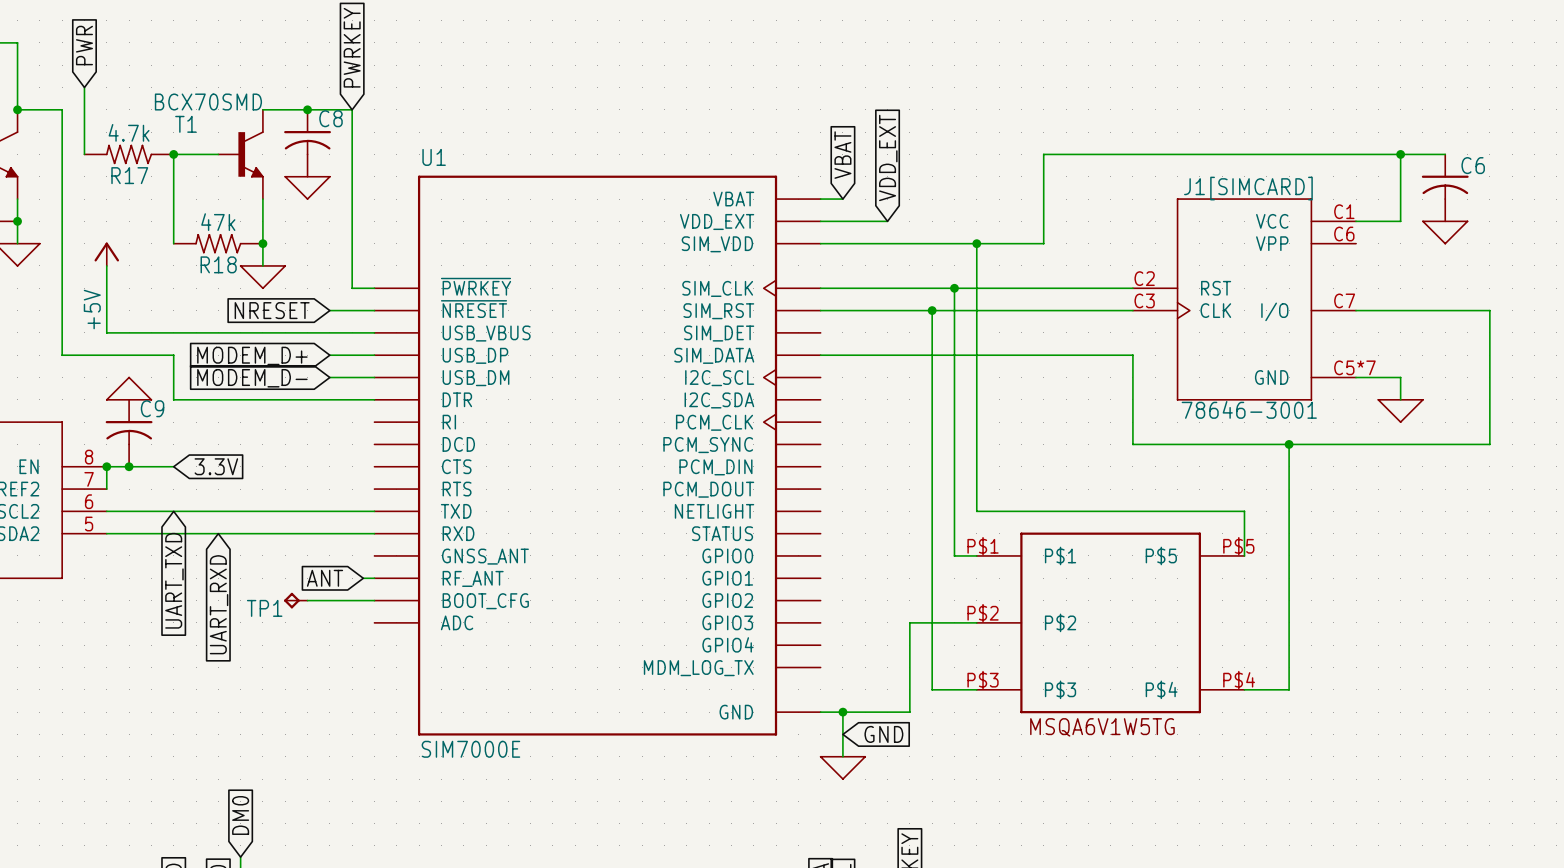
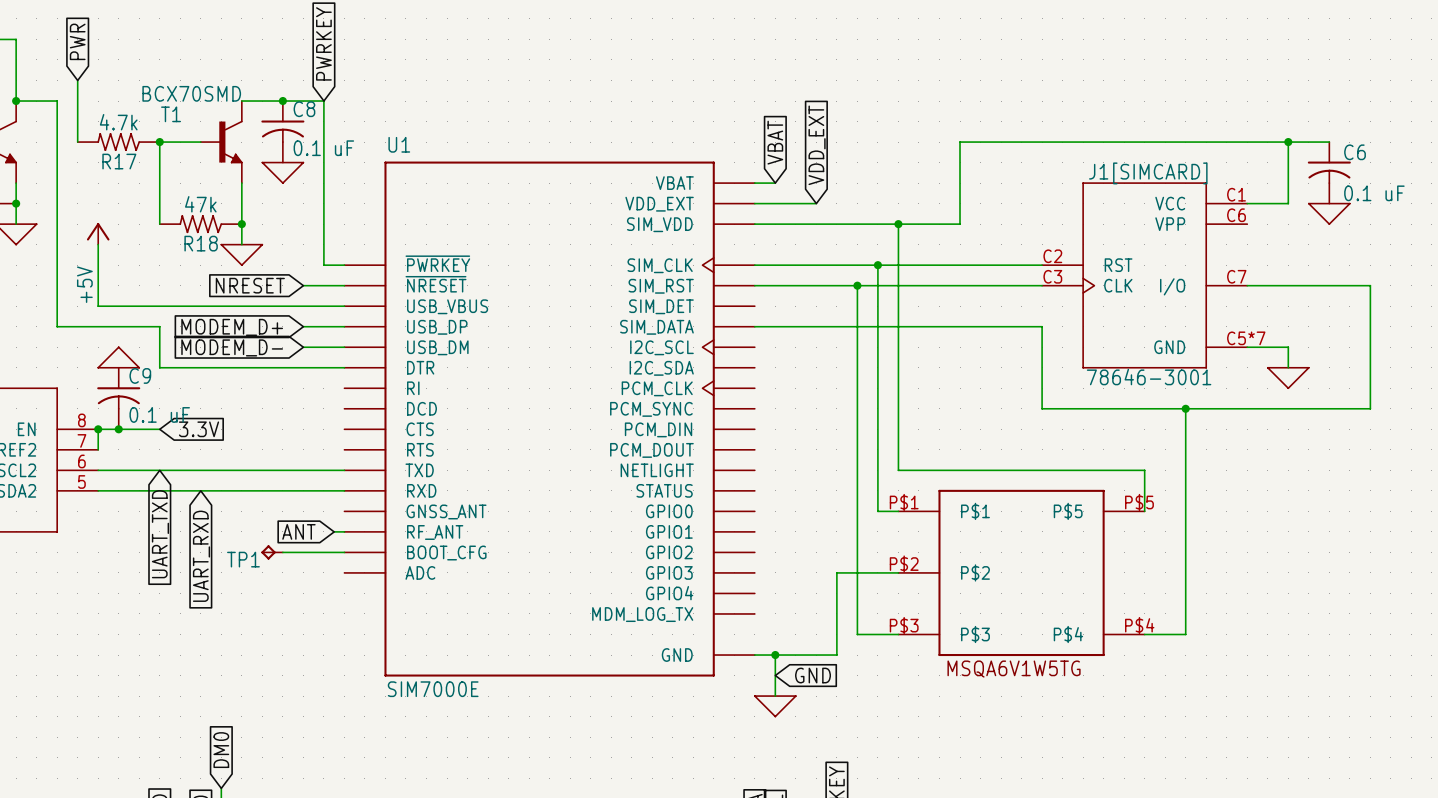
C8 value: none -> 0.1 uF (323, 148)
C6 value: none -> 0.1 uF (1374, 193)
C9 value: none -> 0.1 uF (159, 414)

